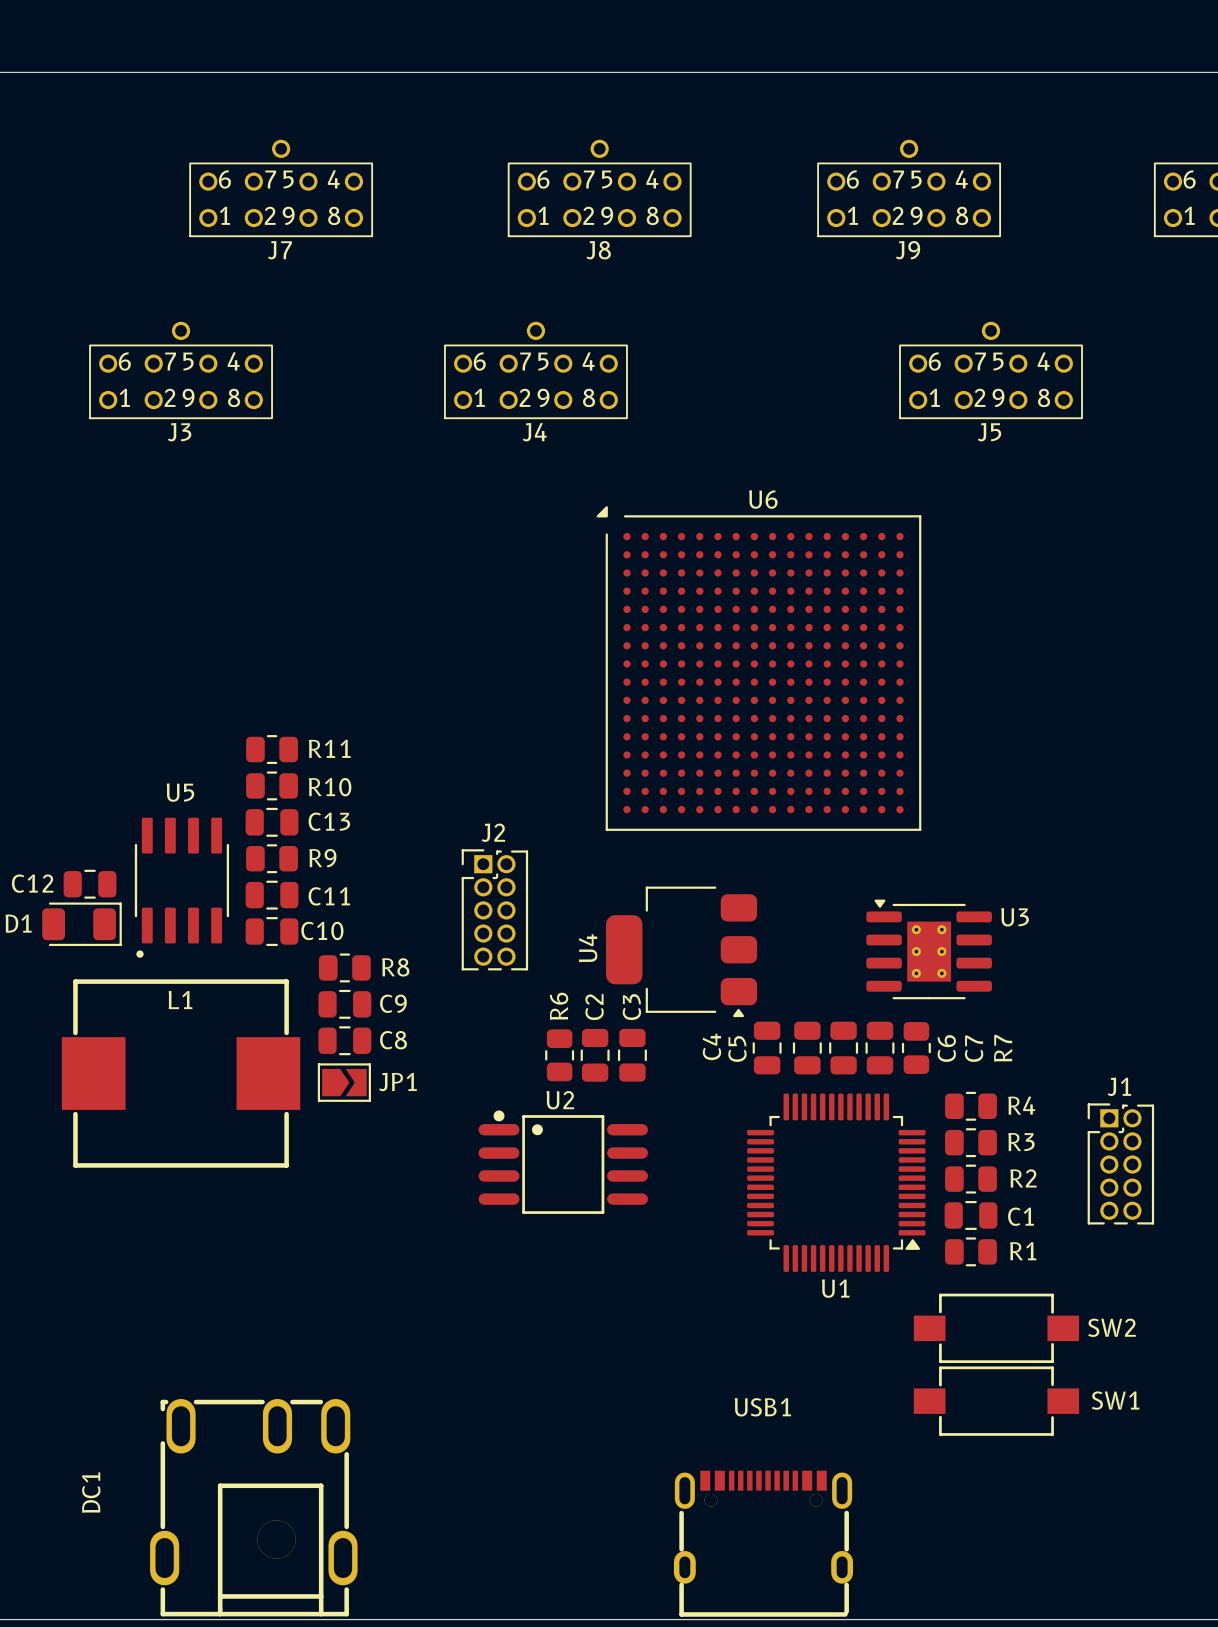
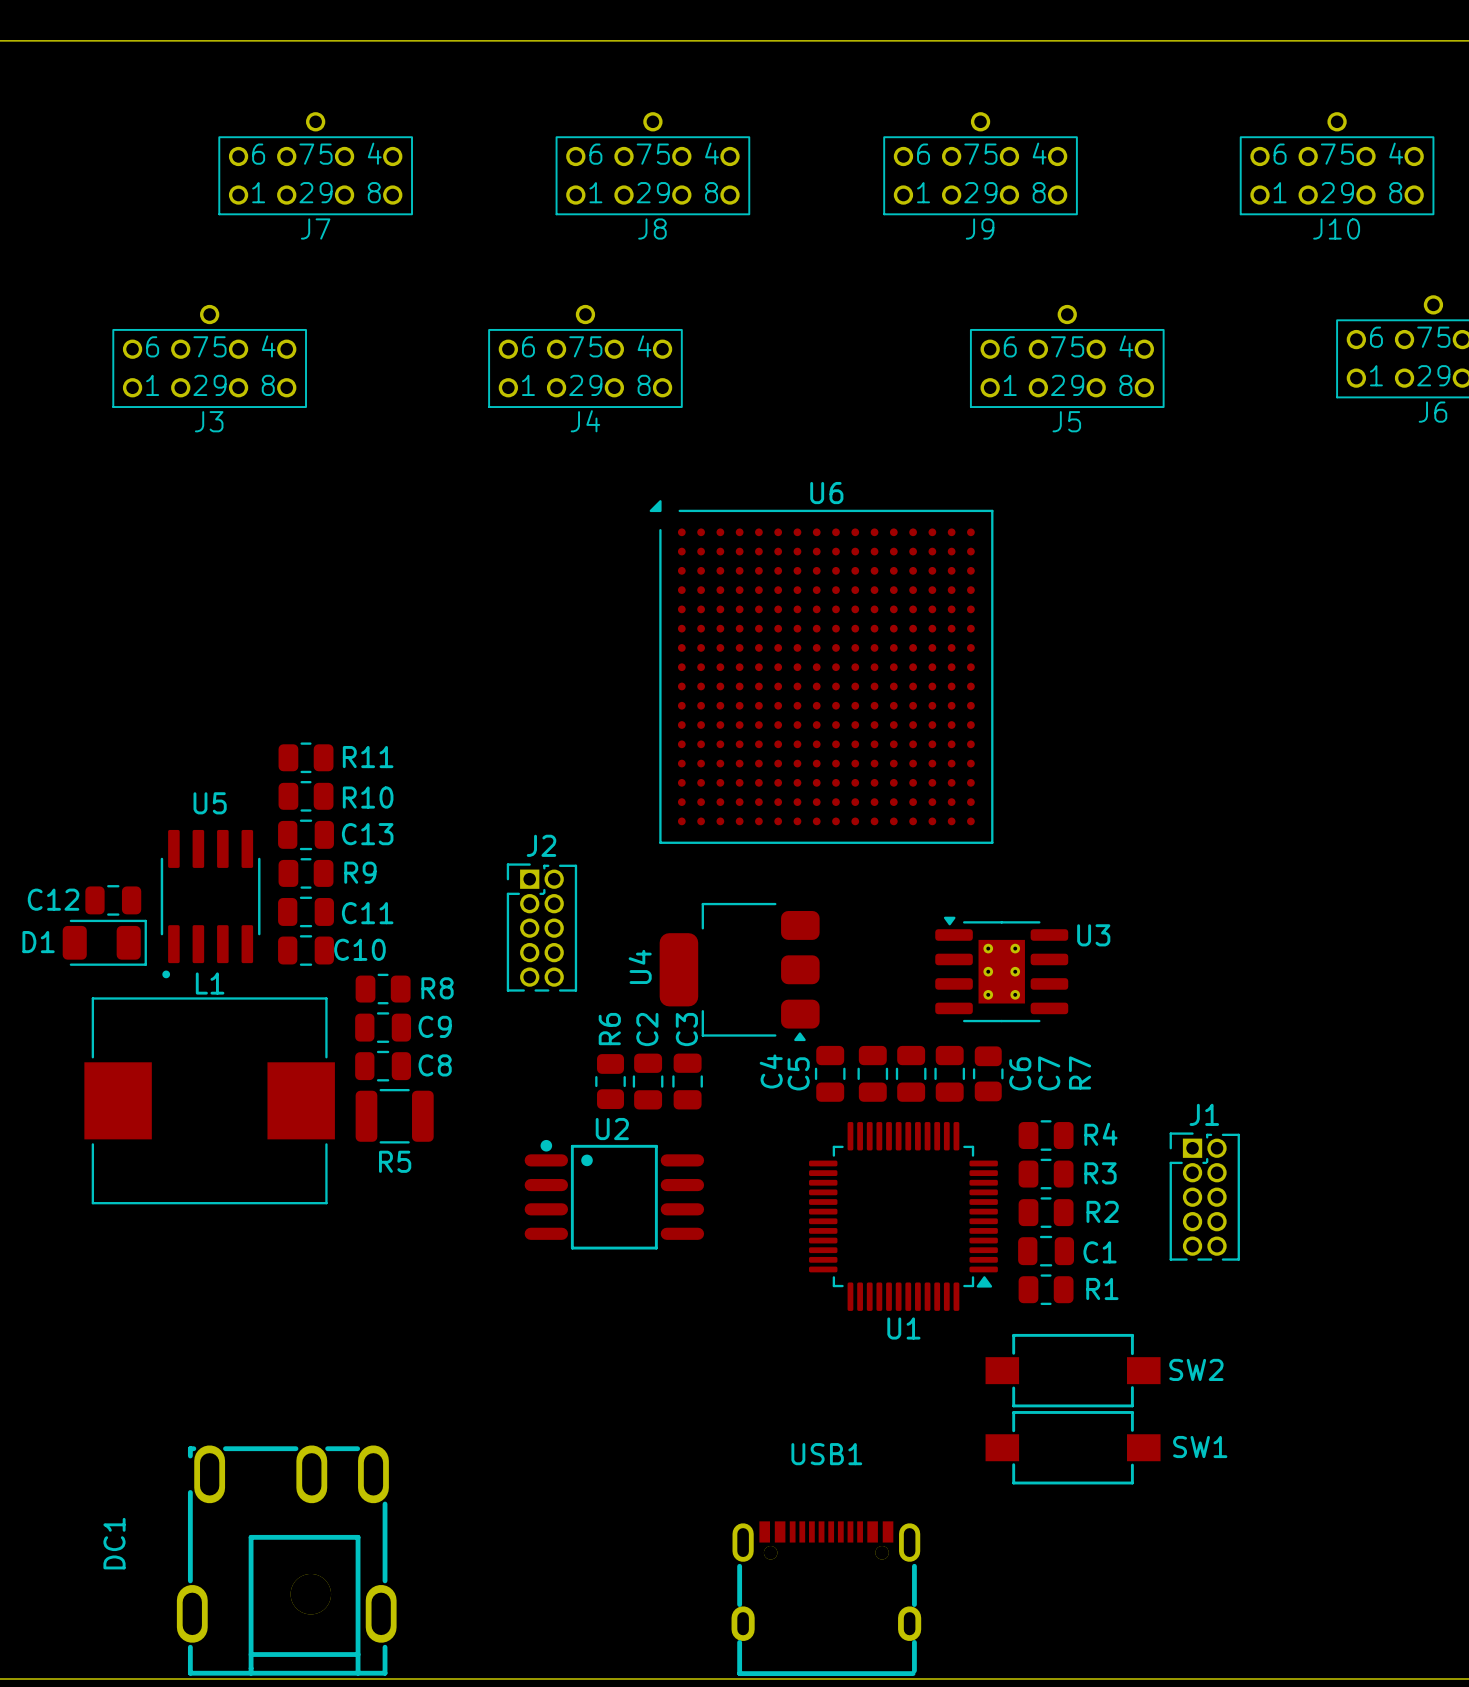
L1 footprint: [61, 979, 301, 1168] -> [84, 997, 335, 1205]
L1 name position: L1 (180, 1000) -> L1 (210, 983)
JP1: (344, 1082) -> none
R5: none -> (394, 1116)

